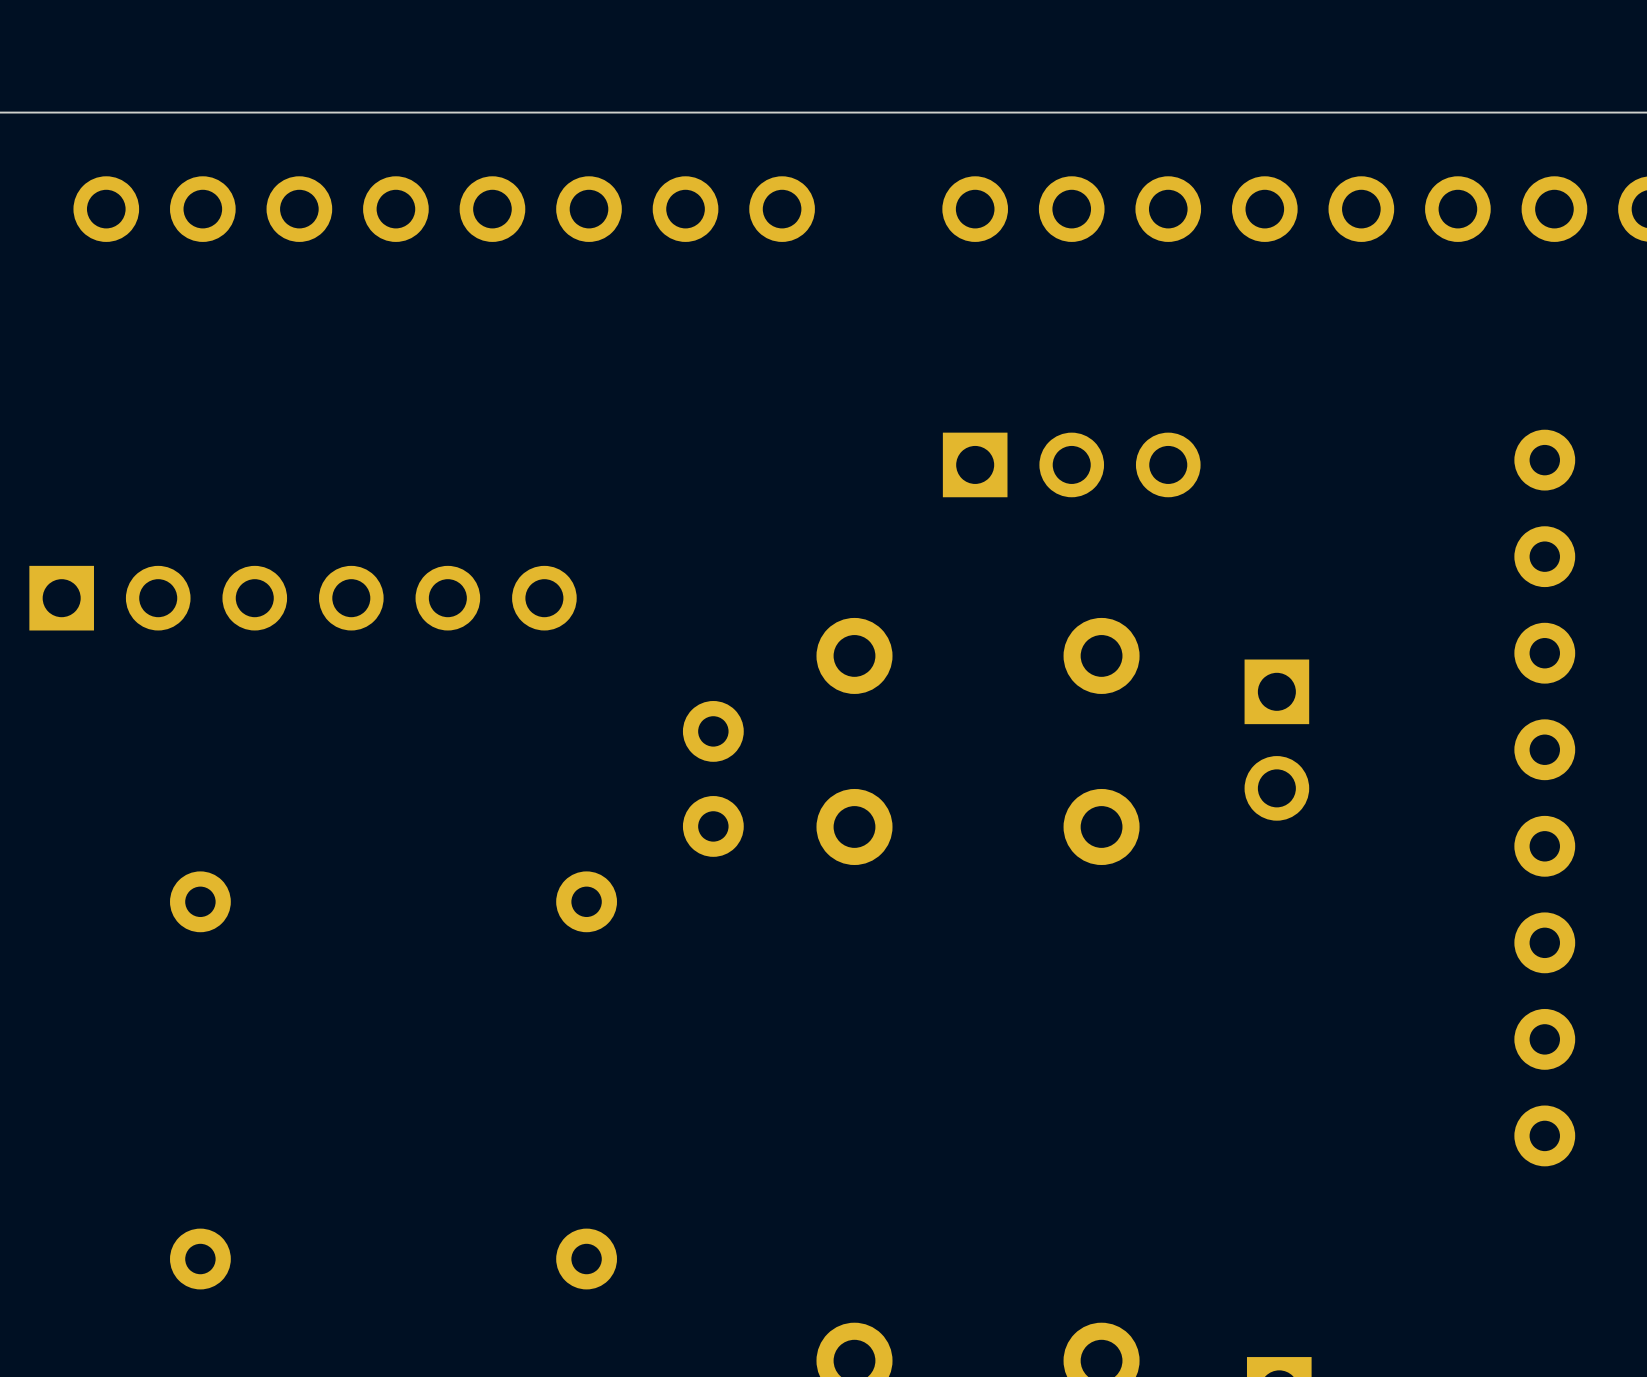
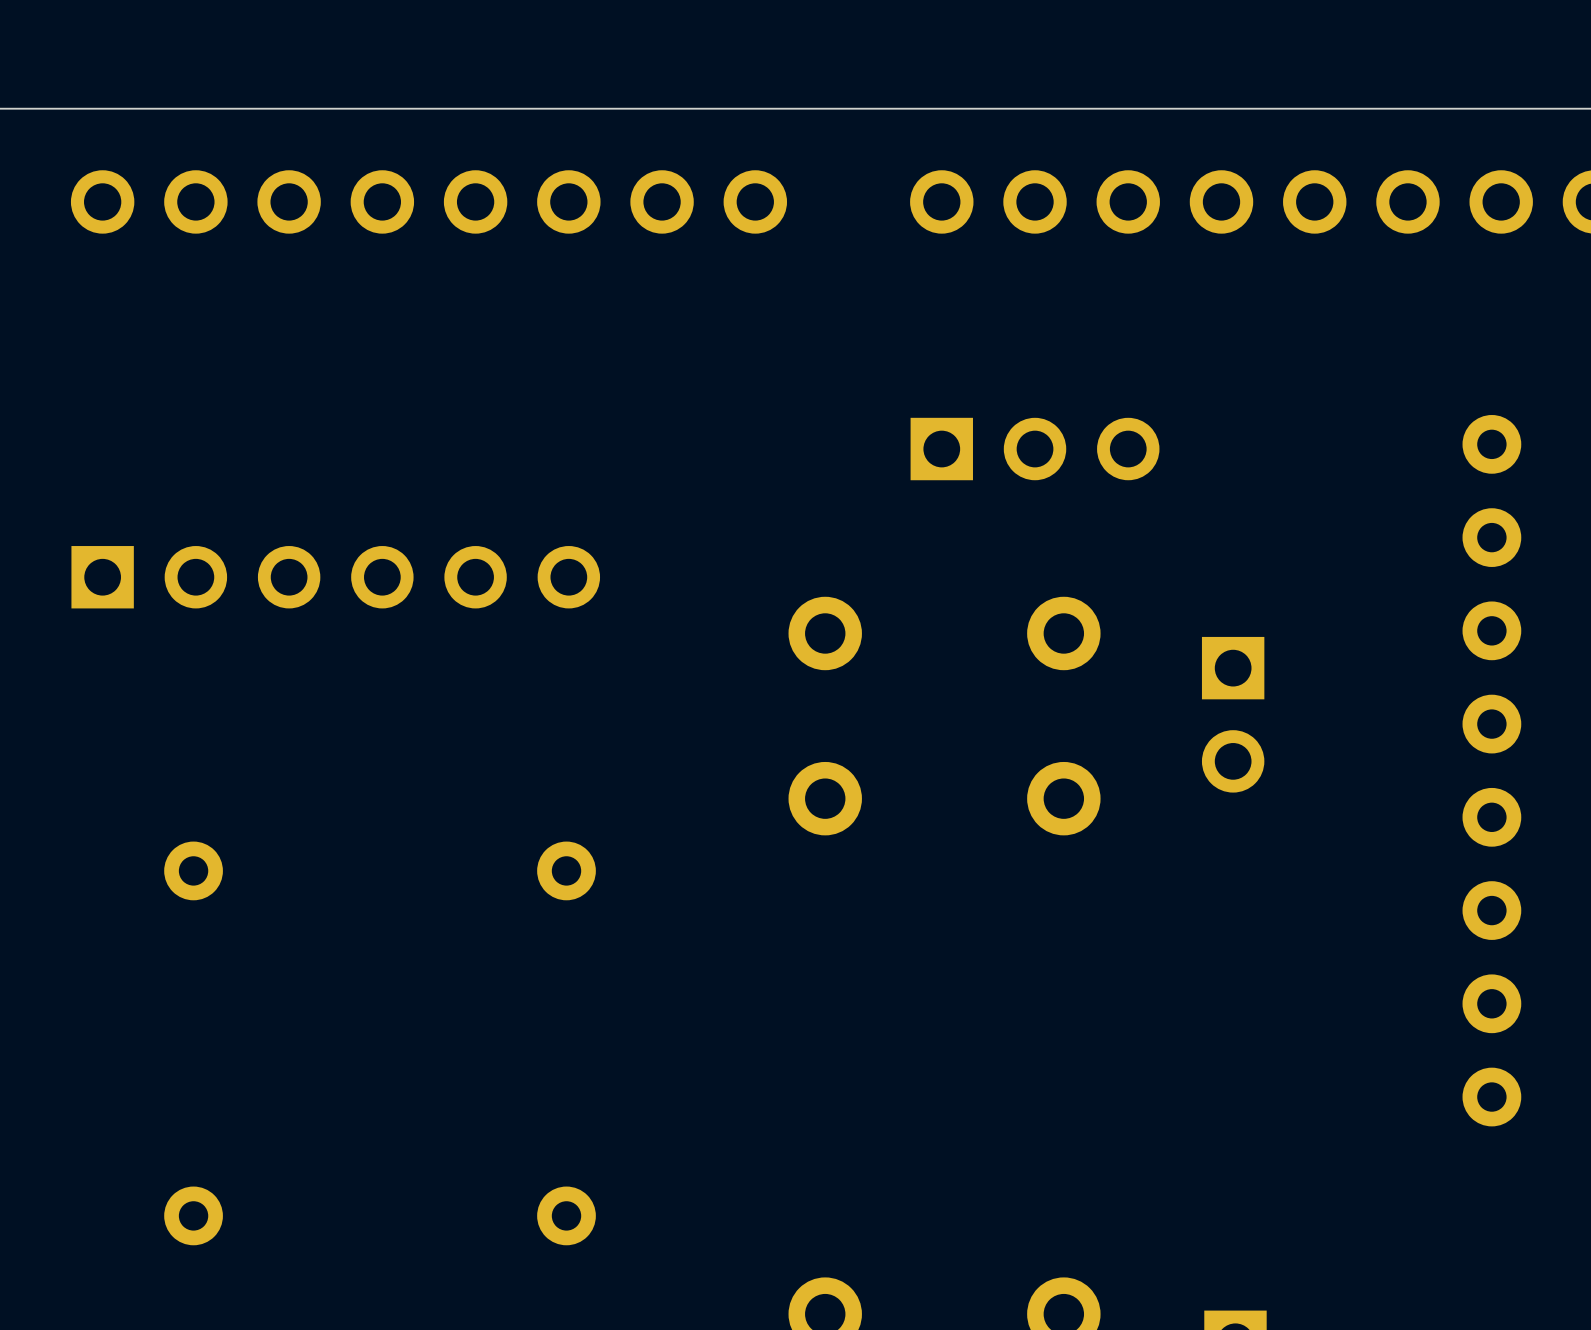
part position: (303, 598) -> (335, 577)
part: (713, 778) -> none

